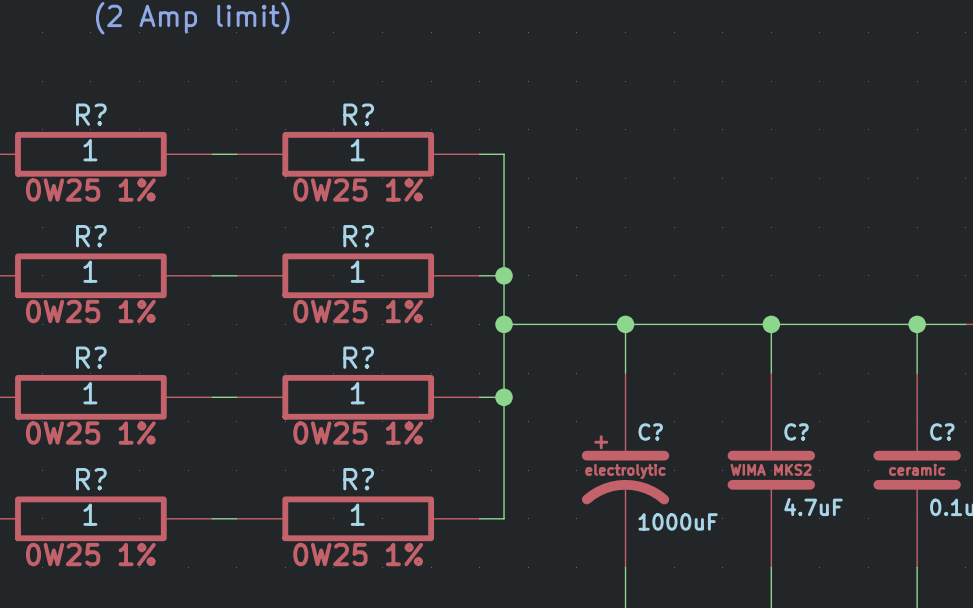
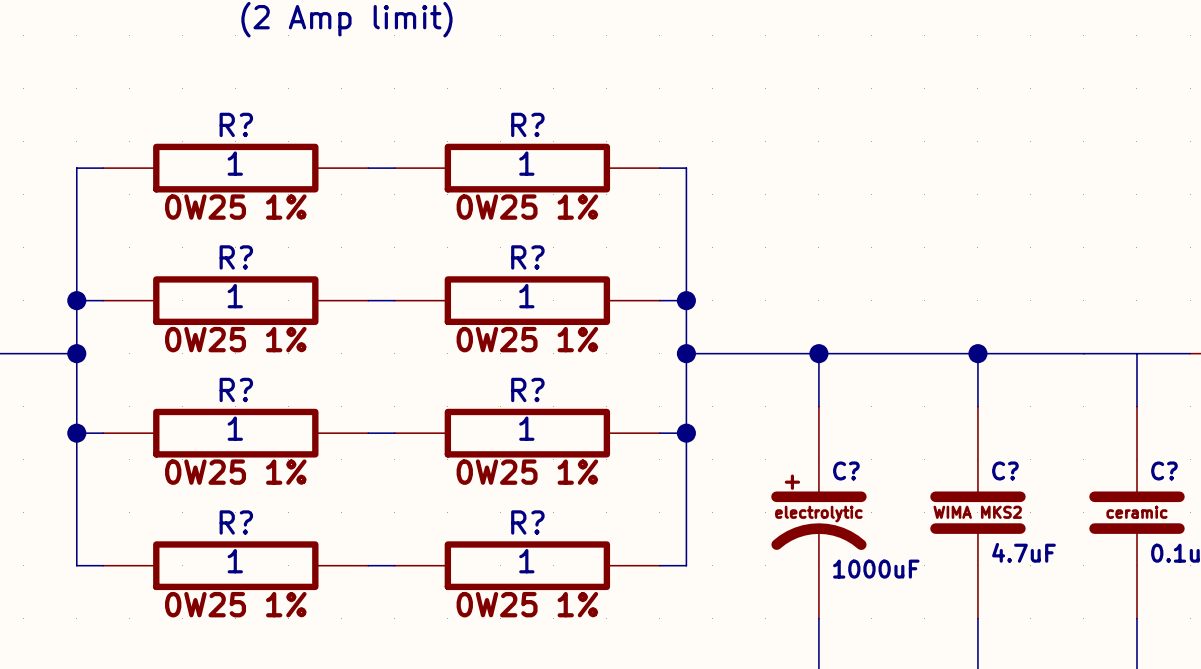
junction: (917, 324) -> none

